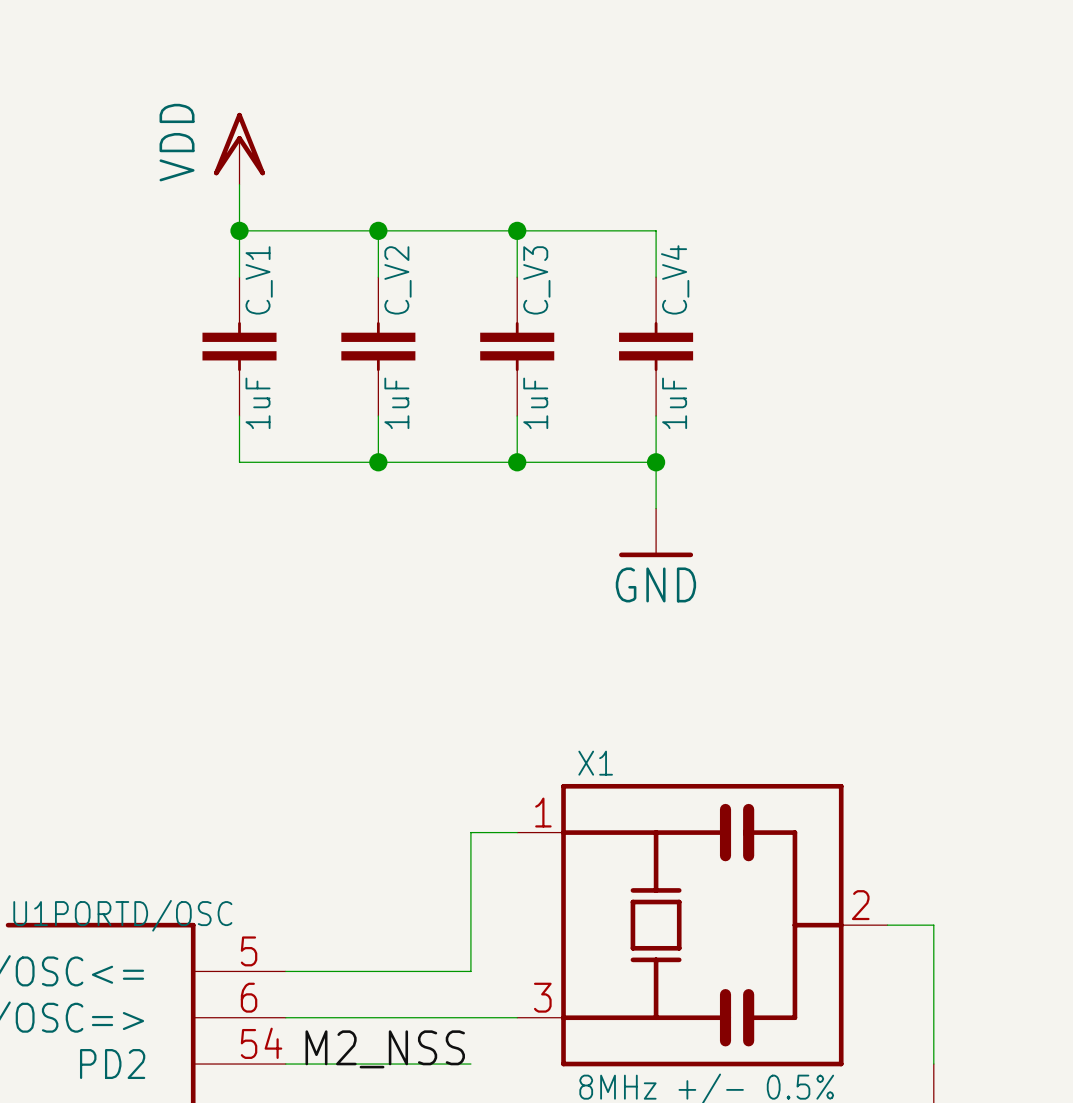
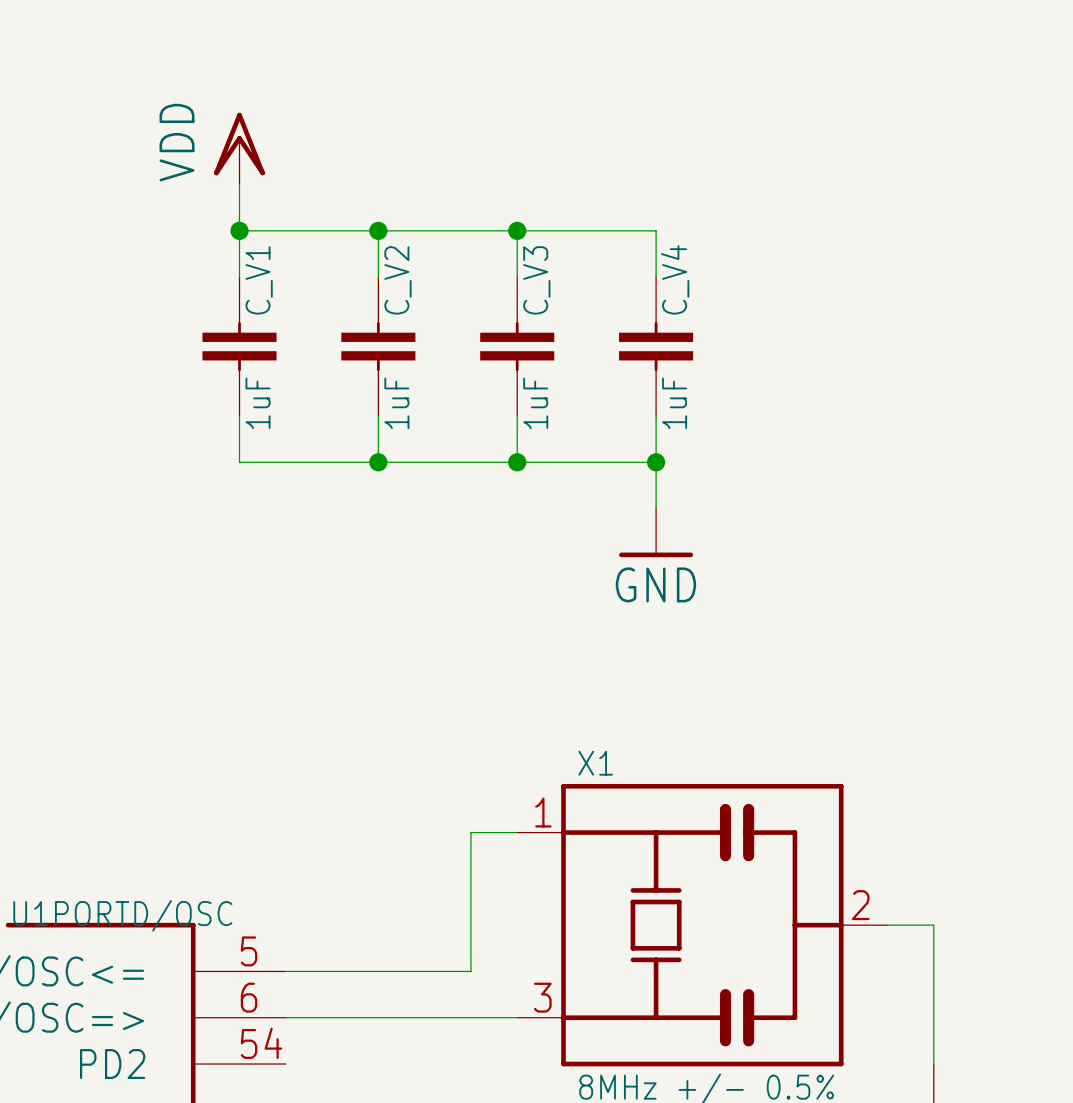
label: M2_NSS (385, 1049) -> none
wire: (285, 1064) (470, 1064) -> none

